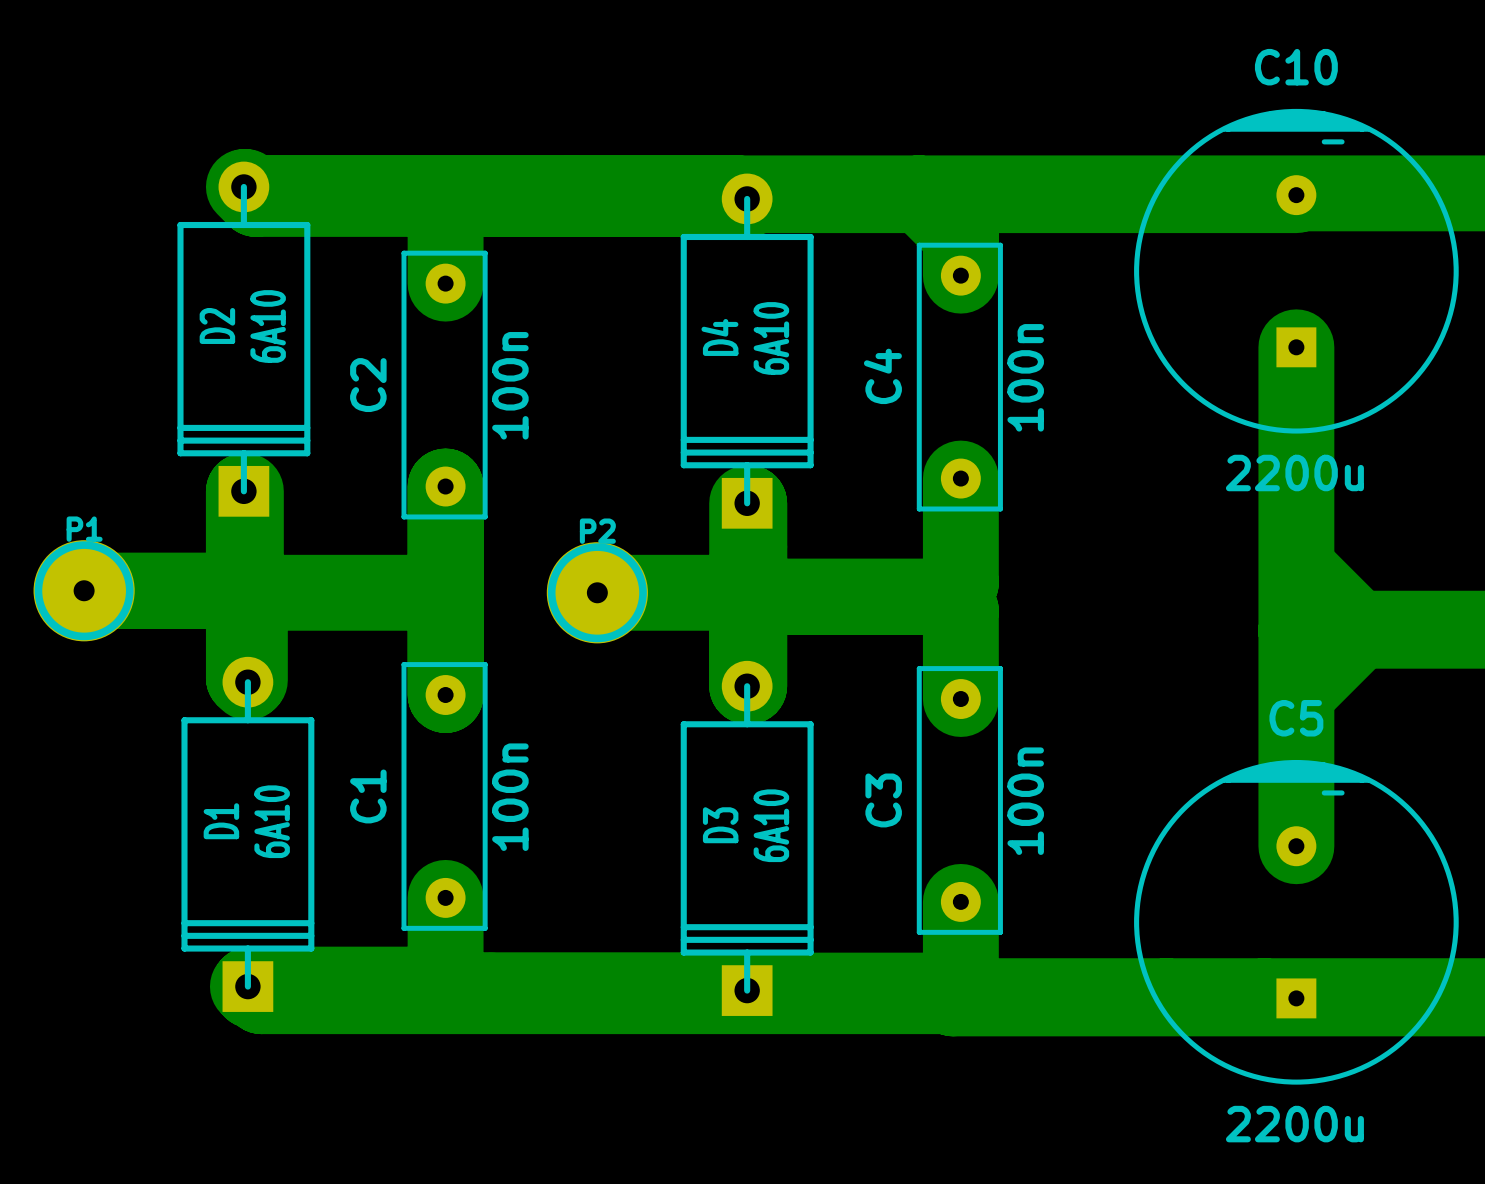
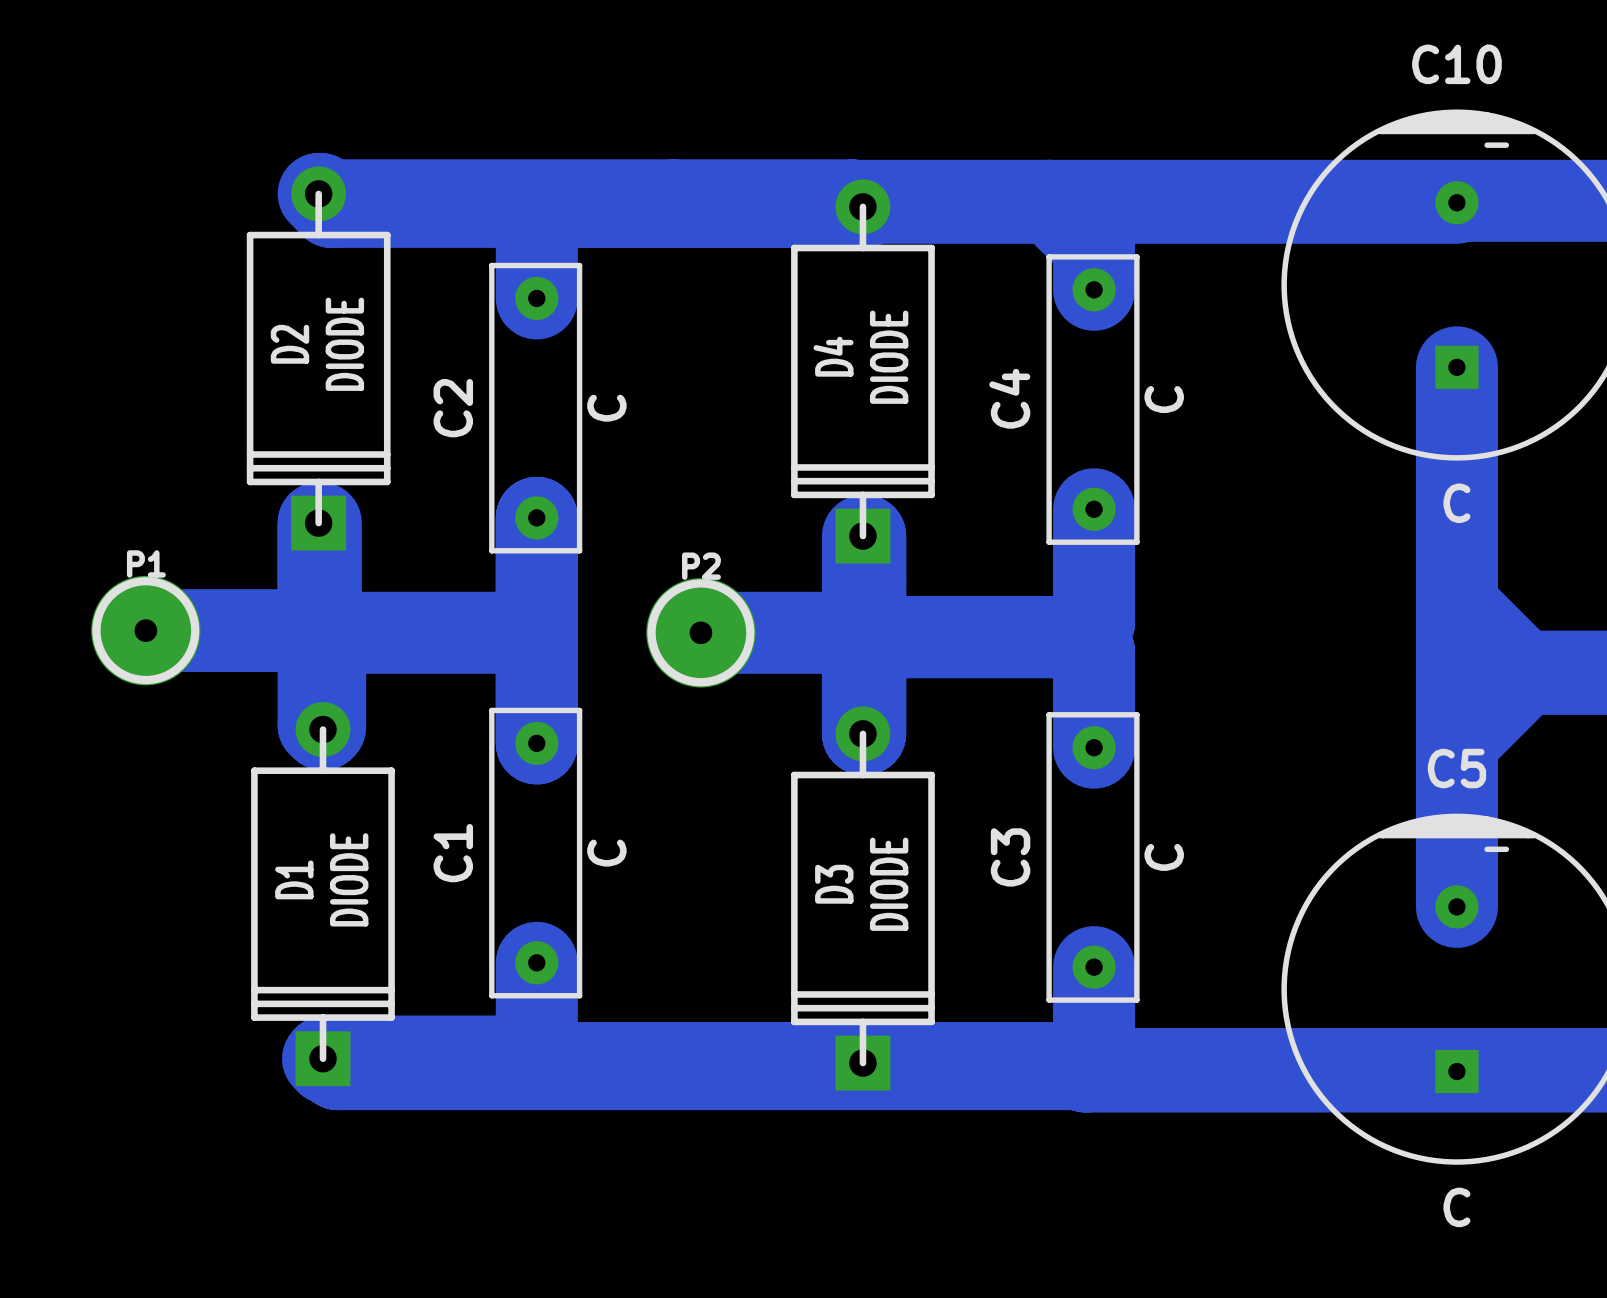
D2 value: 6A10 (268, 326) -> DIODE (344, 344)
D4 value: 6A10 (771, 338) -> DIODE (889, 357)
C4 value: 100n (1025, 377) -> C (1164, 399)
C2 value: 100n (510, 385) -> C (606, 408)
C10 value: 2200u (1294, 473) -> C (1456, 503)
C1 value: 100n (510, 797) -> C (606, 853)
C3 value: 100n (1025, 801) -> C (1164, 857)
D1 value: 6A10 (272, 821) -> DIODE (349, 879)
D3 value: 6A10 (771, 825) -> DIODE (889, 884)
C5 value: 2200u (1294, 1124) -> C (1456, 1207)

